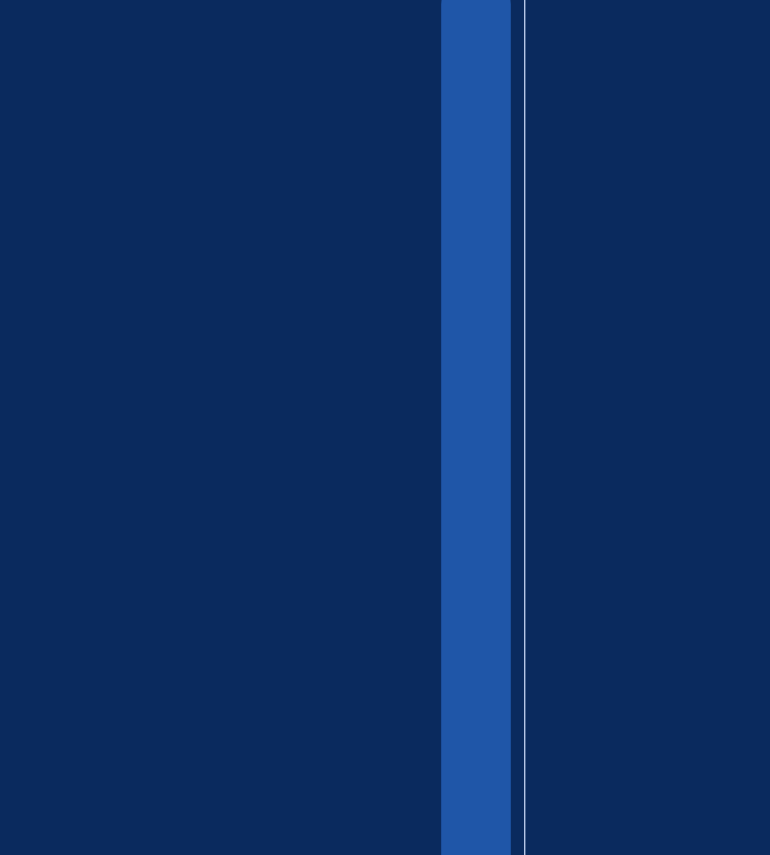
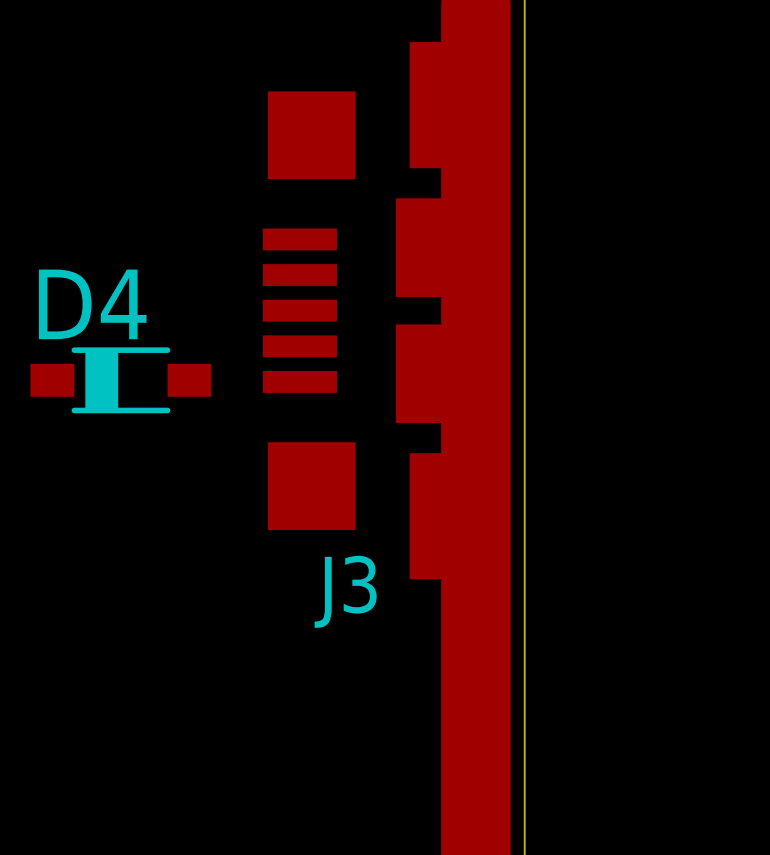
J3: none -> (378, 310)
D4: none -> (120, 380)

